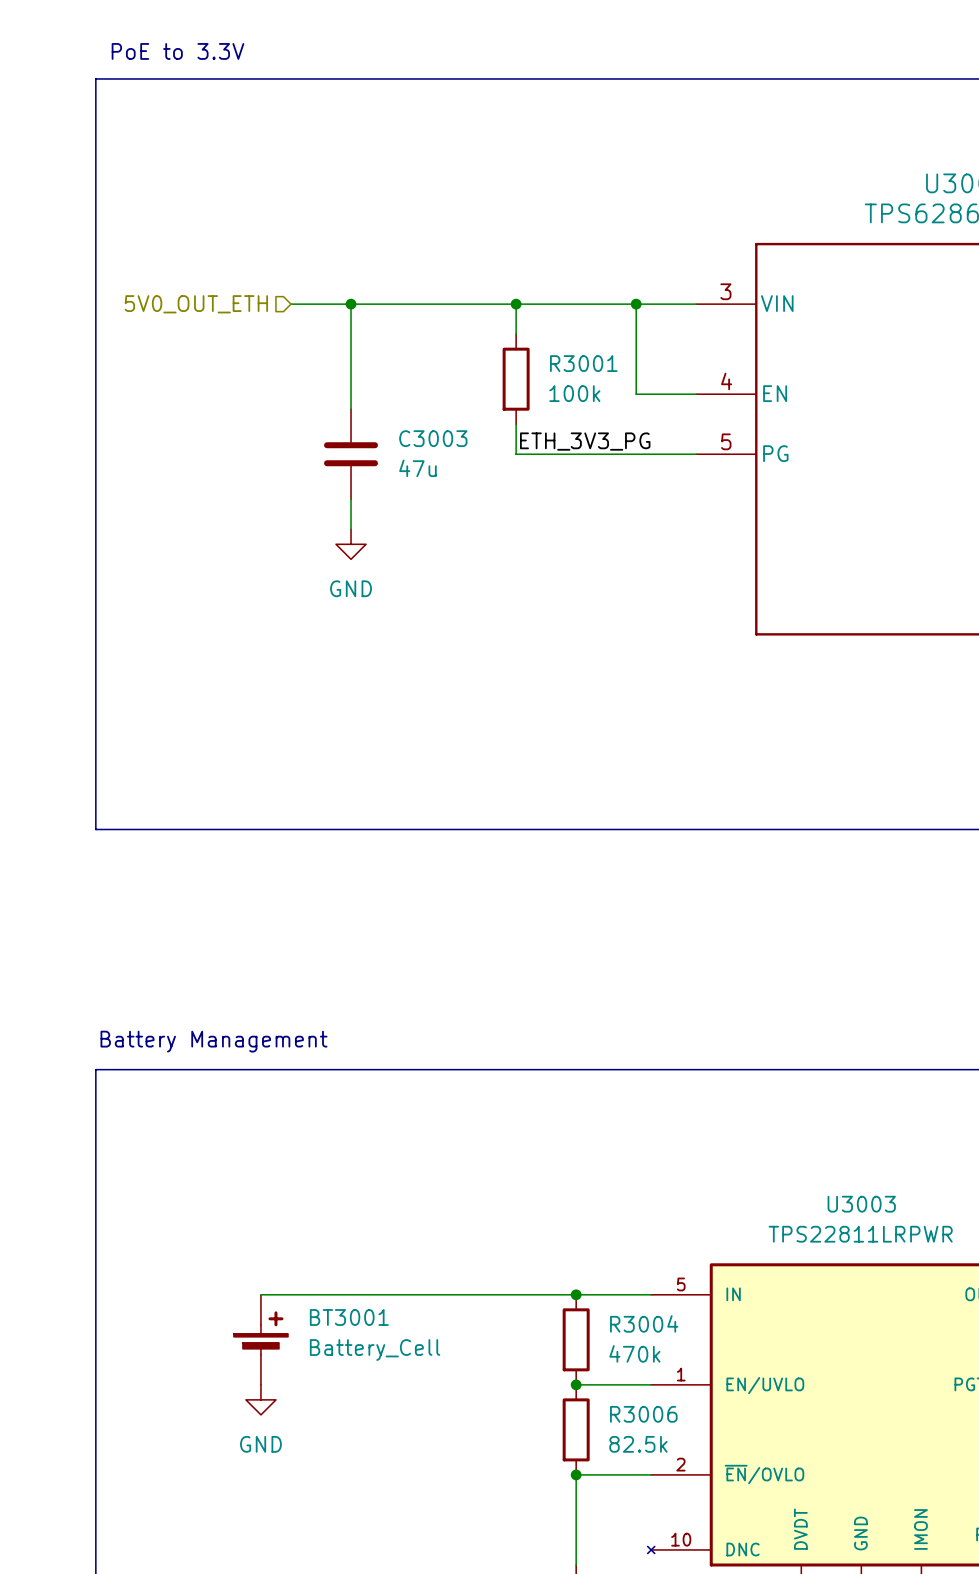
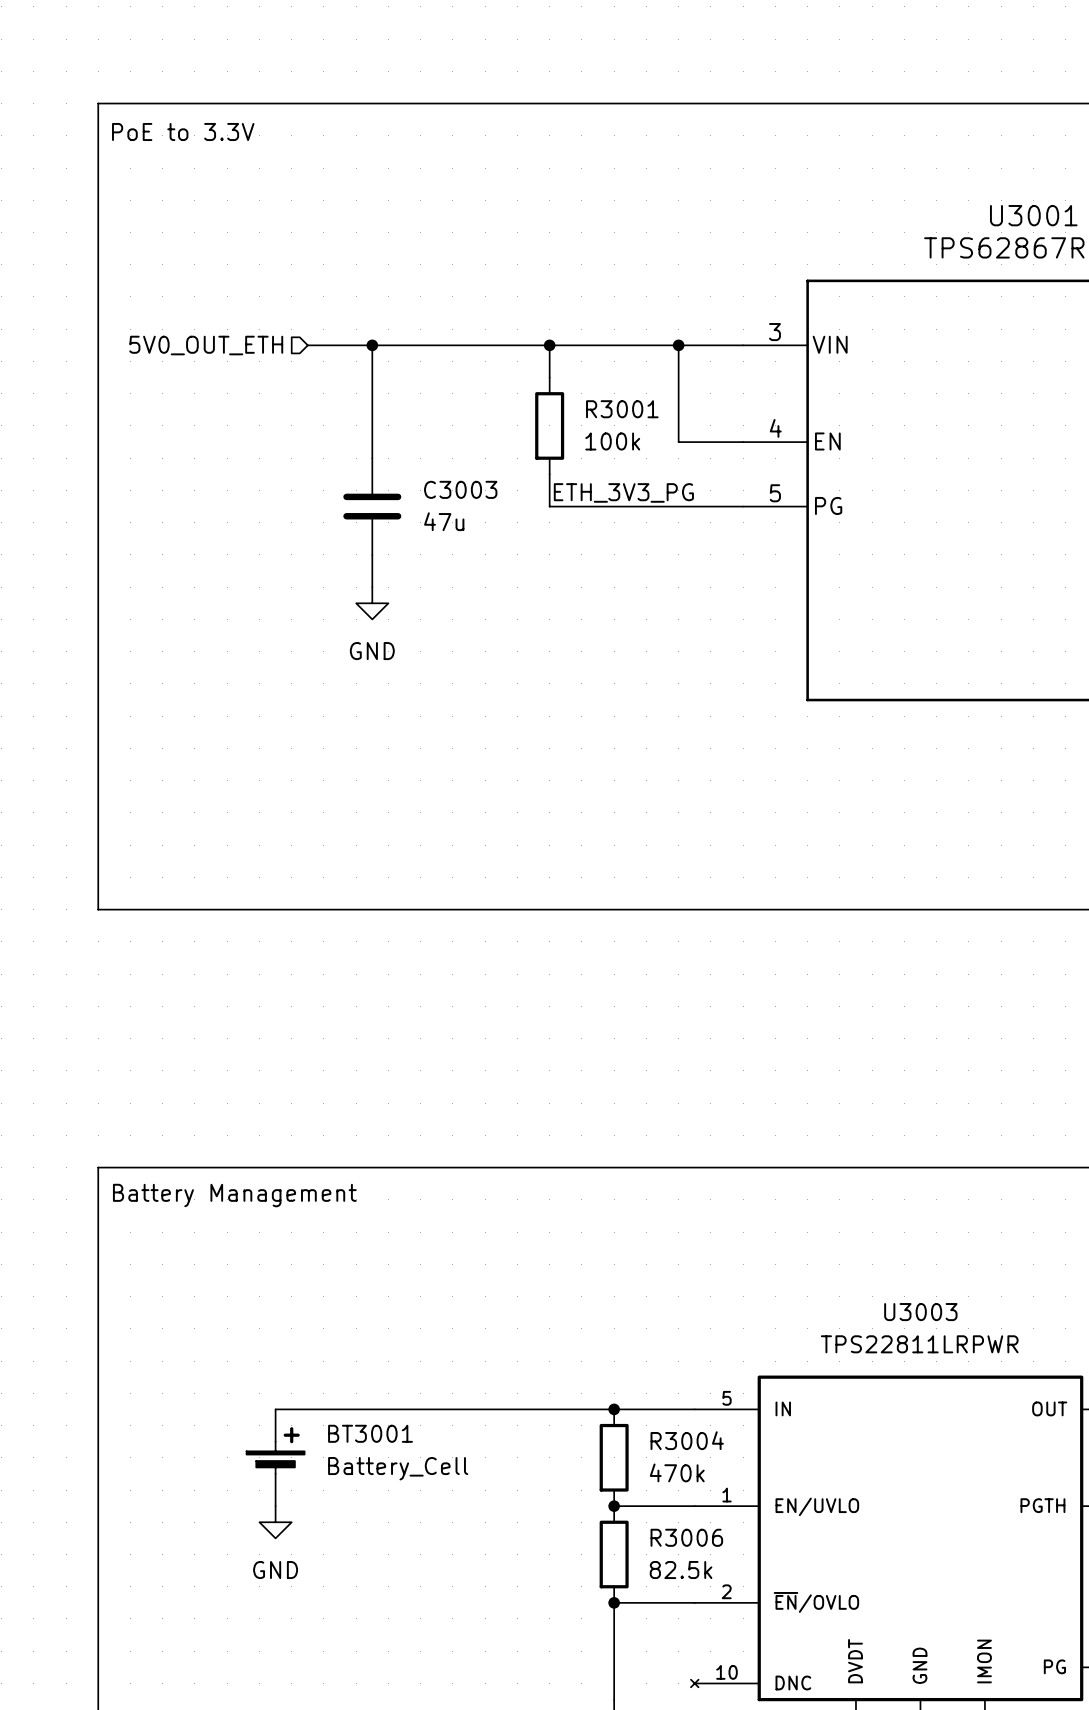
text position: PoE to 3.3V (177, 51) -> PoE to 3.3V (183, 131)
text position: Battery Management (213, 1041) -> Battery Management (234, 1195)

